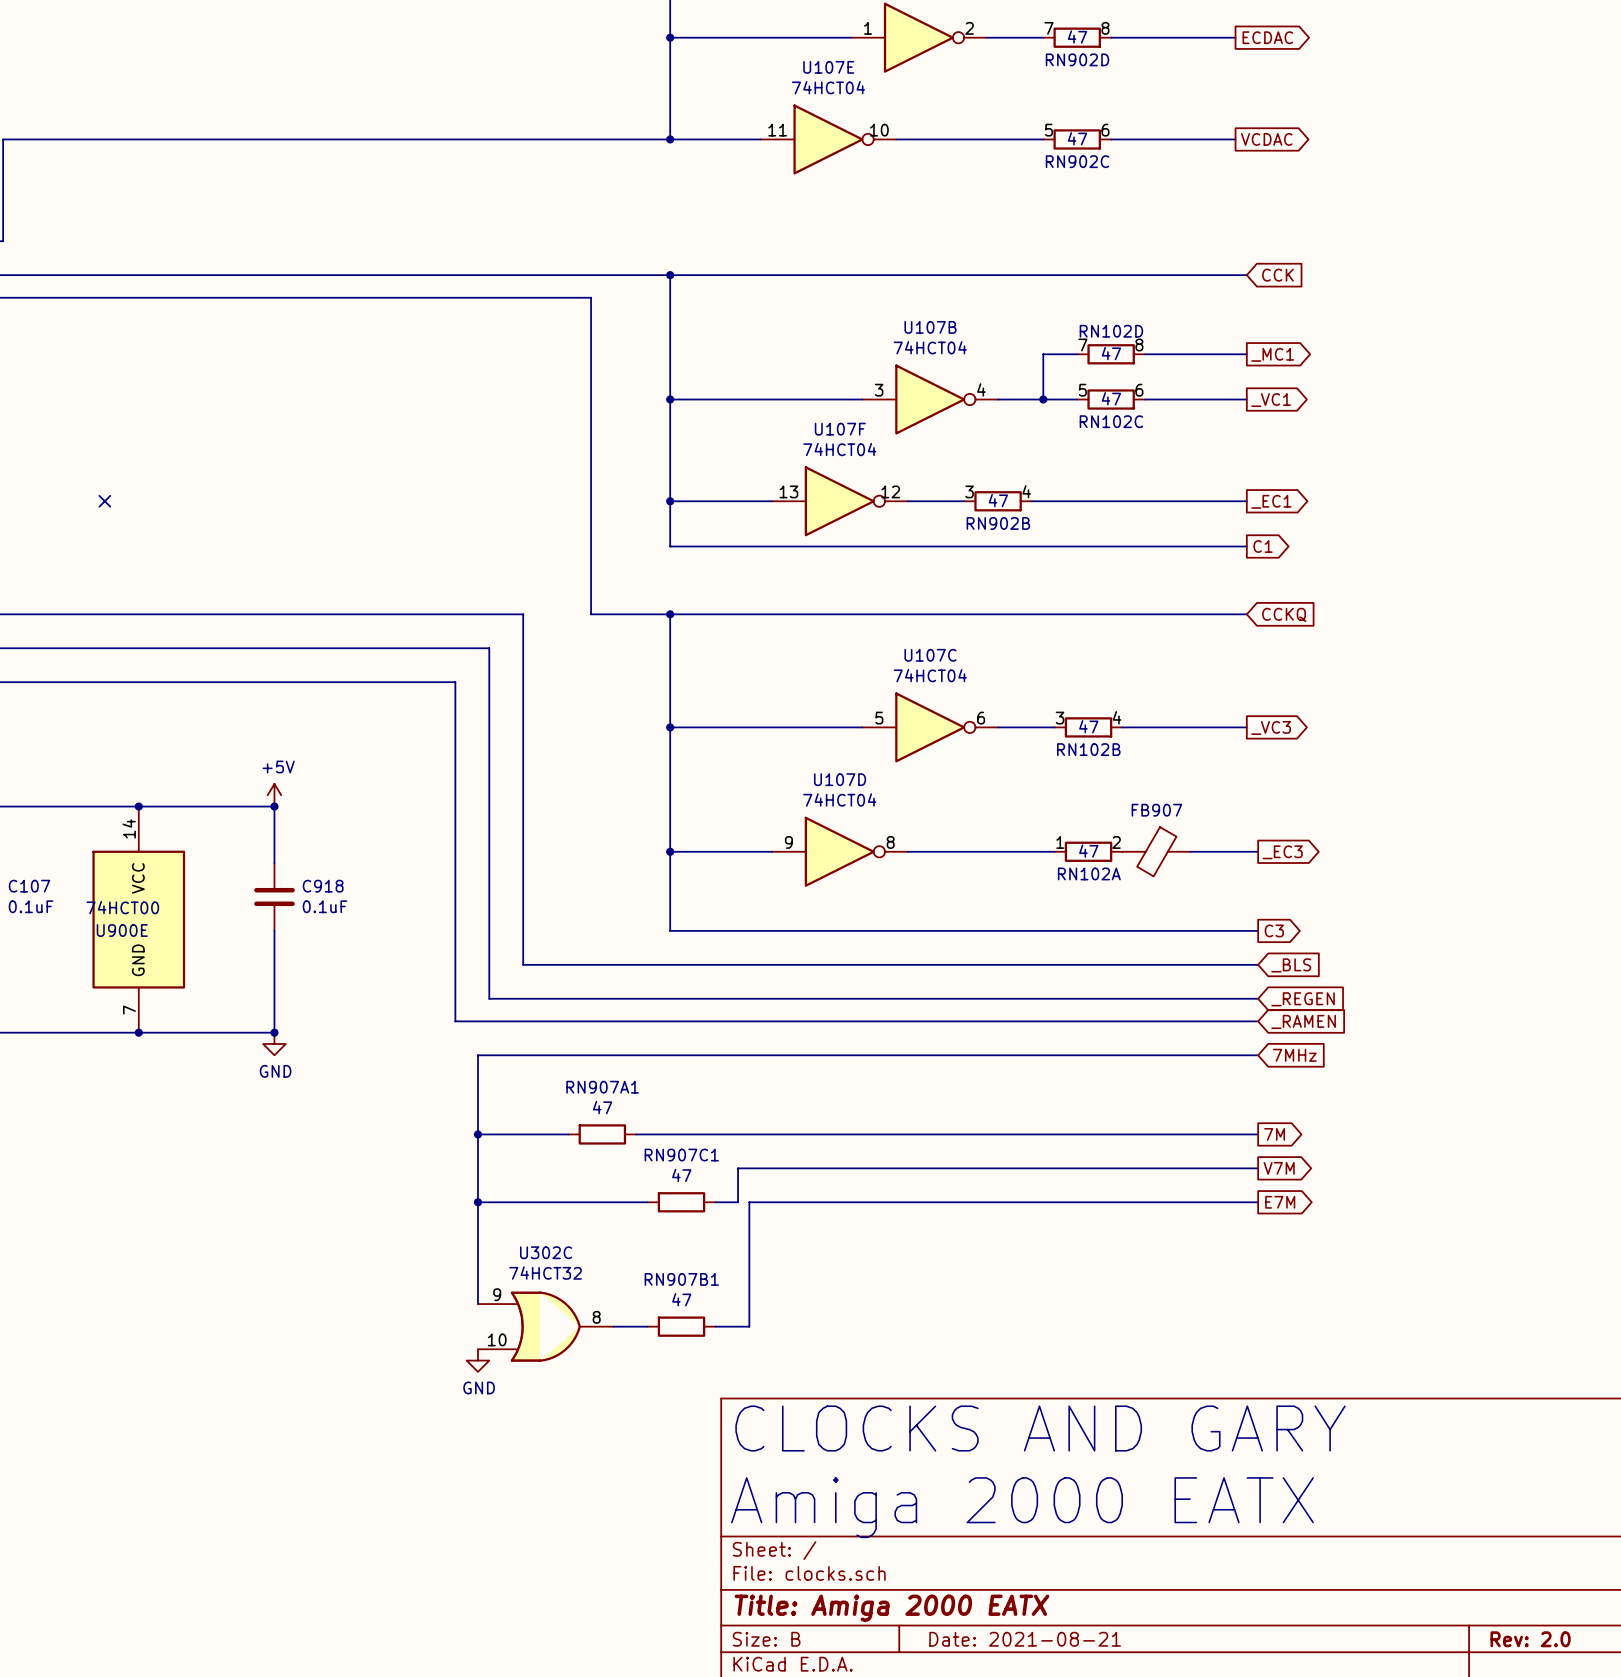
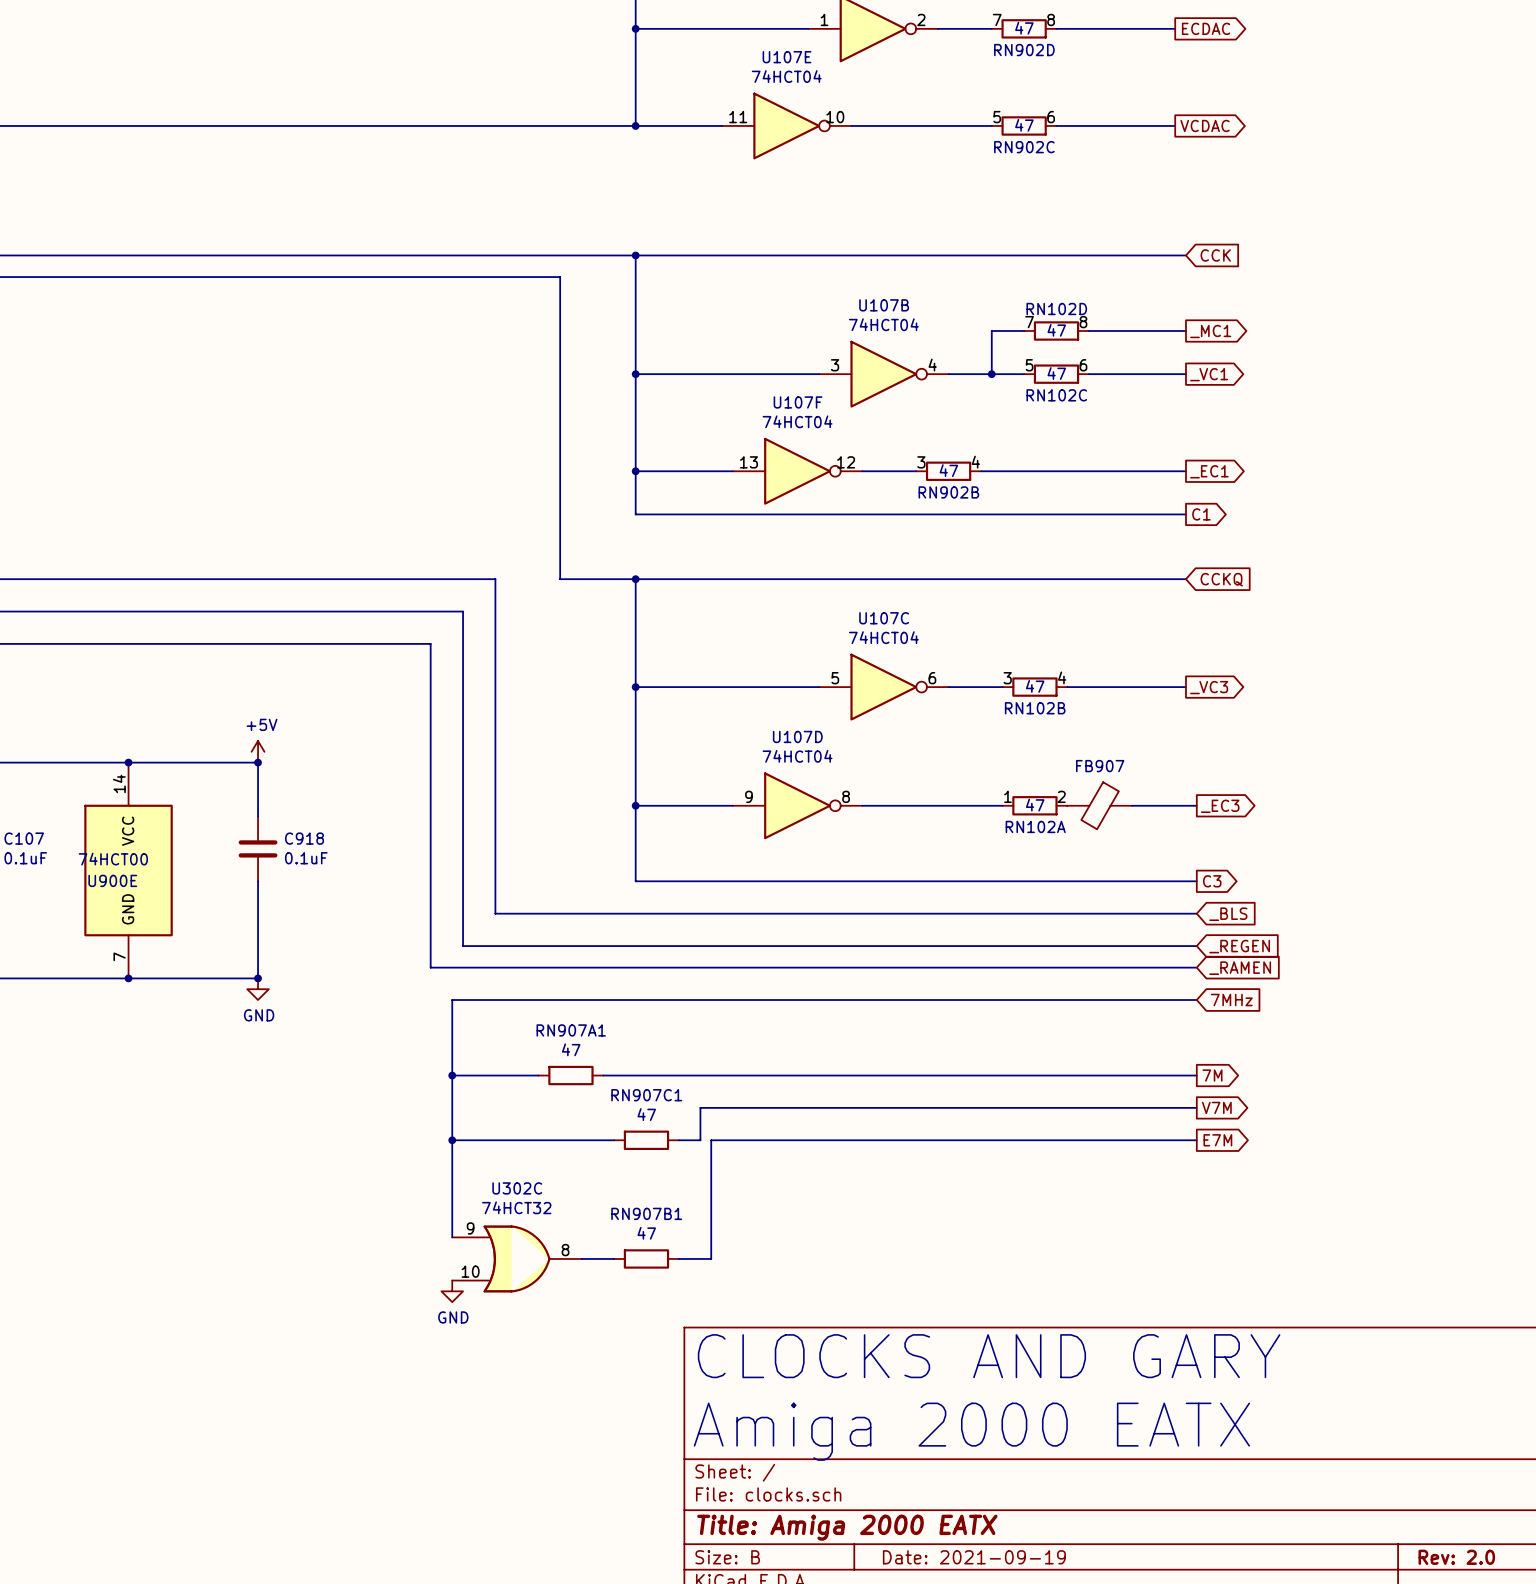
no-connect mark: (104, 501) -> none
title block: Date: 2021-08-21 (1025, 1639) -> Date: 2021-09-19 (974, 1557)

